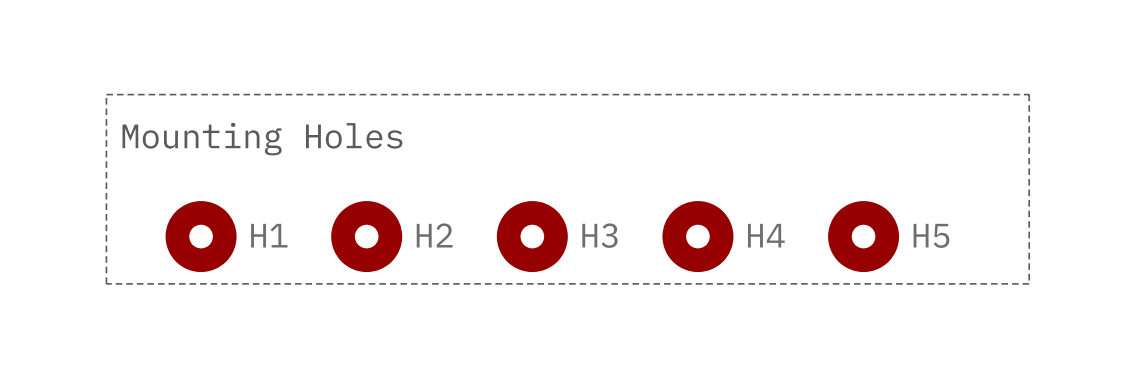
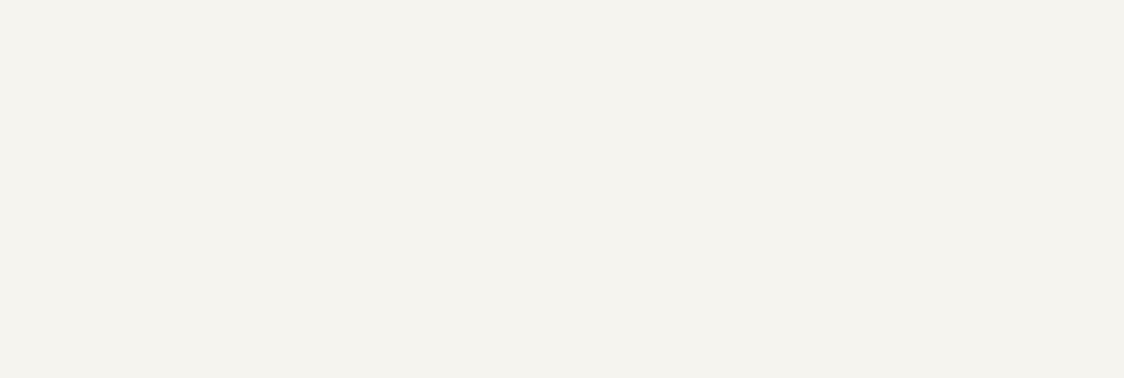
line: (106, 94) (1029, 94) (1029, 283) (106, 283) (106, 94) -> none
text: Mounting Holes (262, 139) -> none
H1: (201, 236) -> none
H2: (366, 236) -> none
H3: (532, 236) -> none
H4: (697, 236) -> none
H5: (863, 236) -> none

